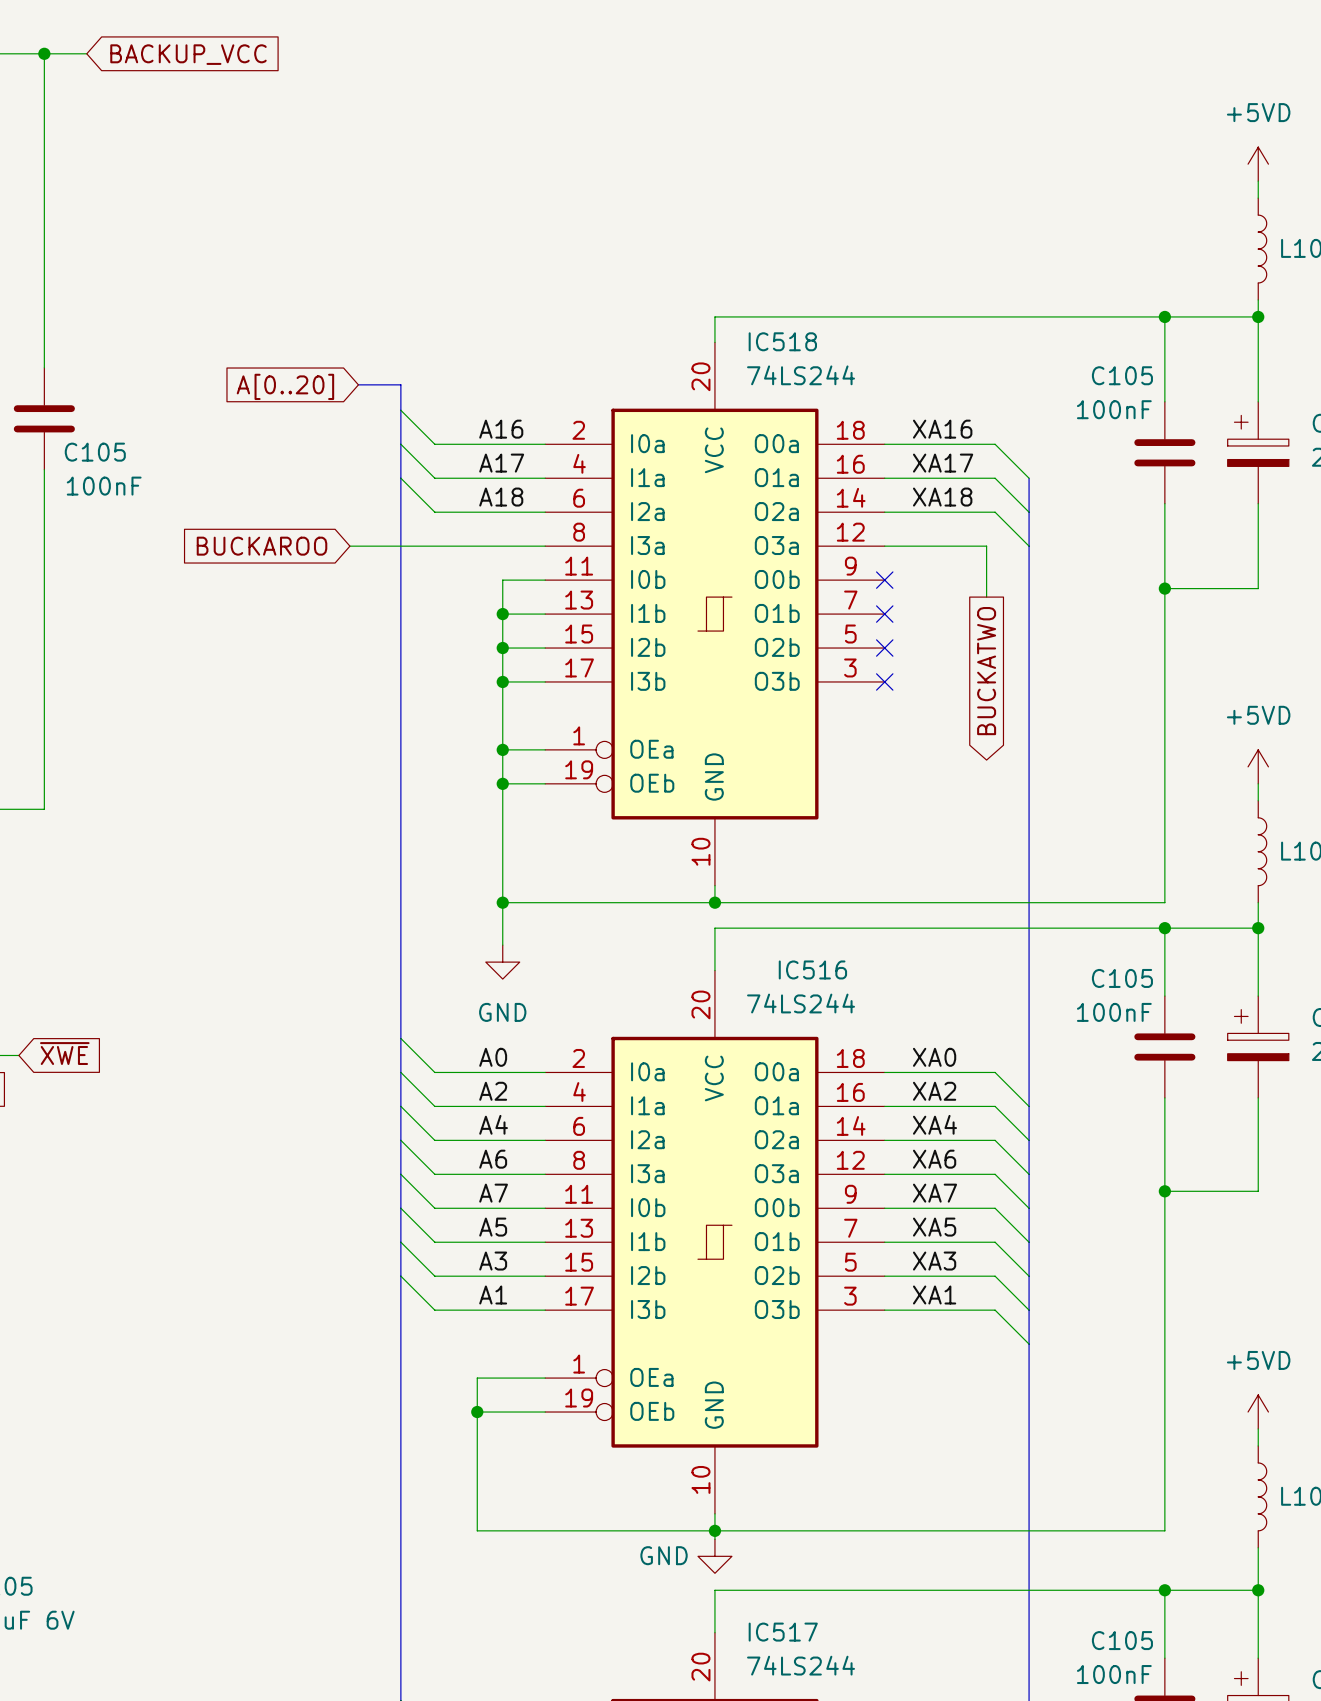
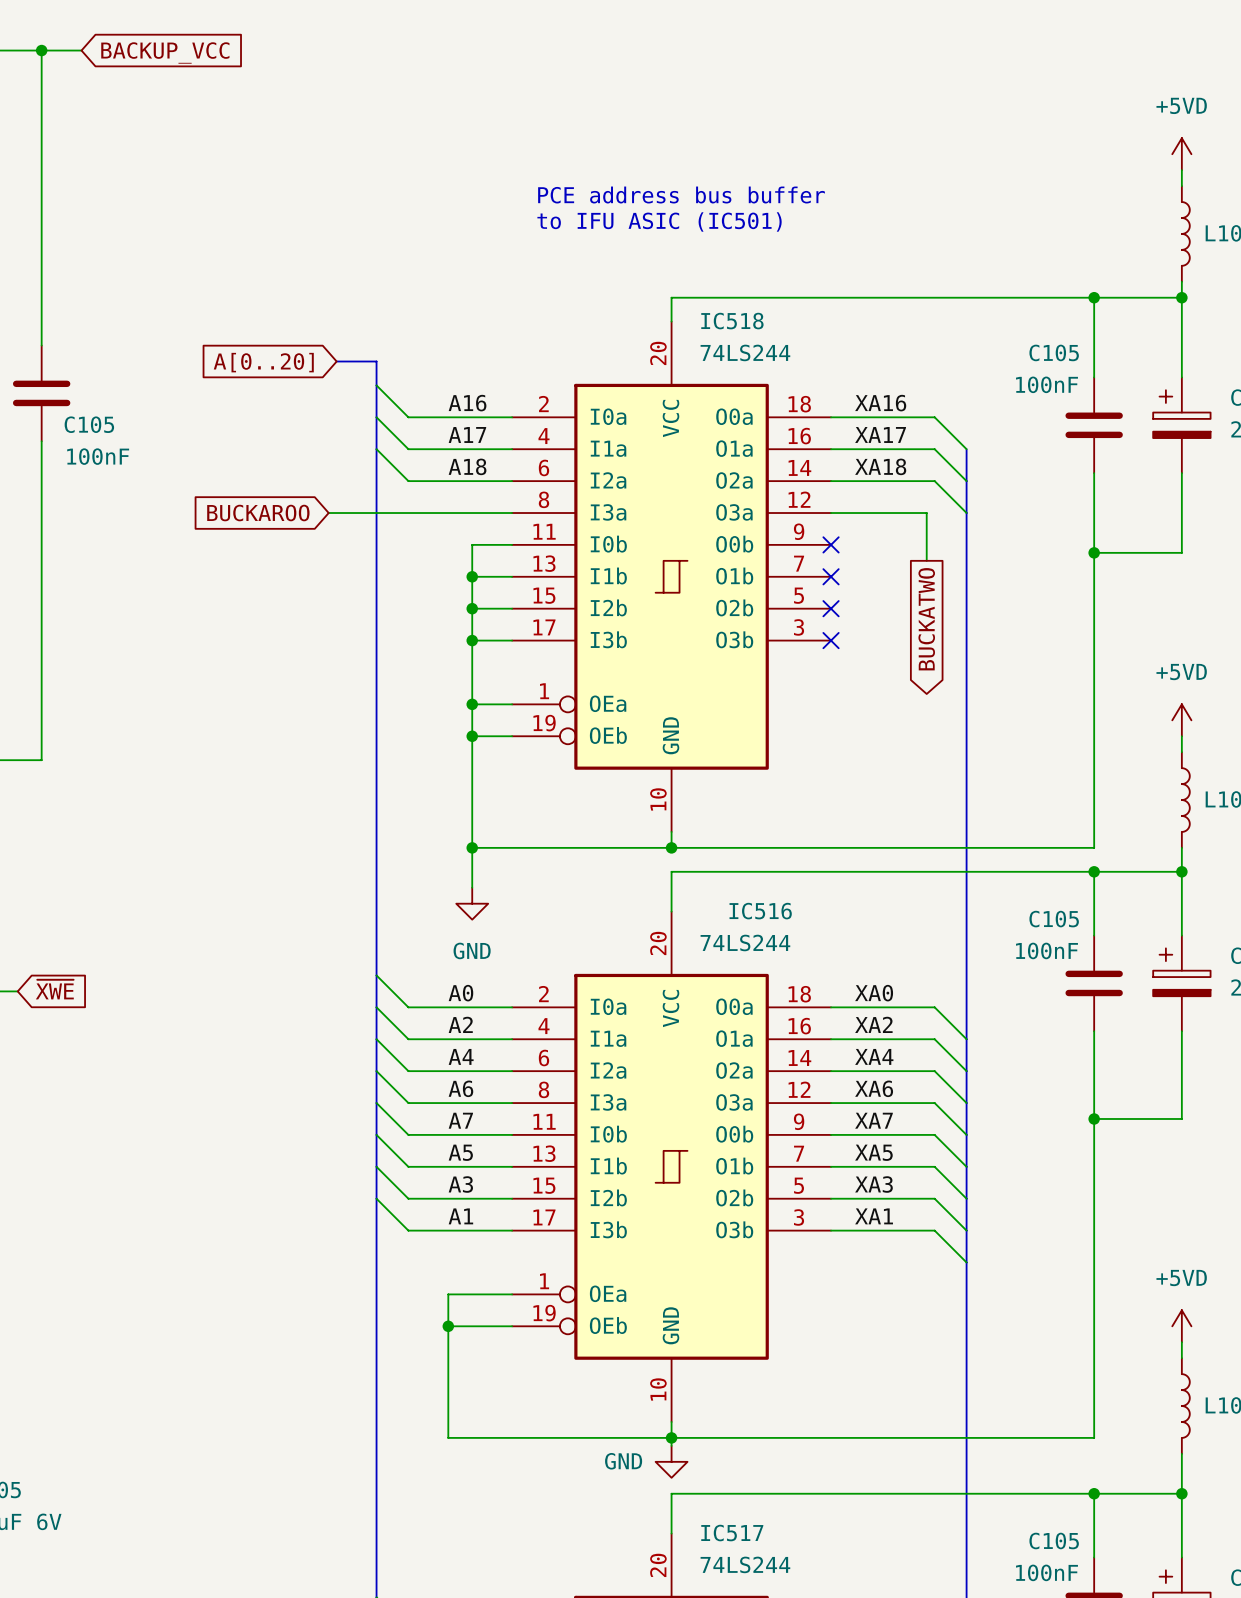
text: none -> PCE address bus buffer (681, 195)
text: none -> to IFU ASIC (IC501) (659, 221)

